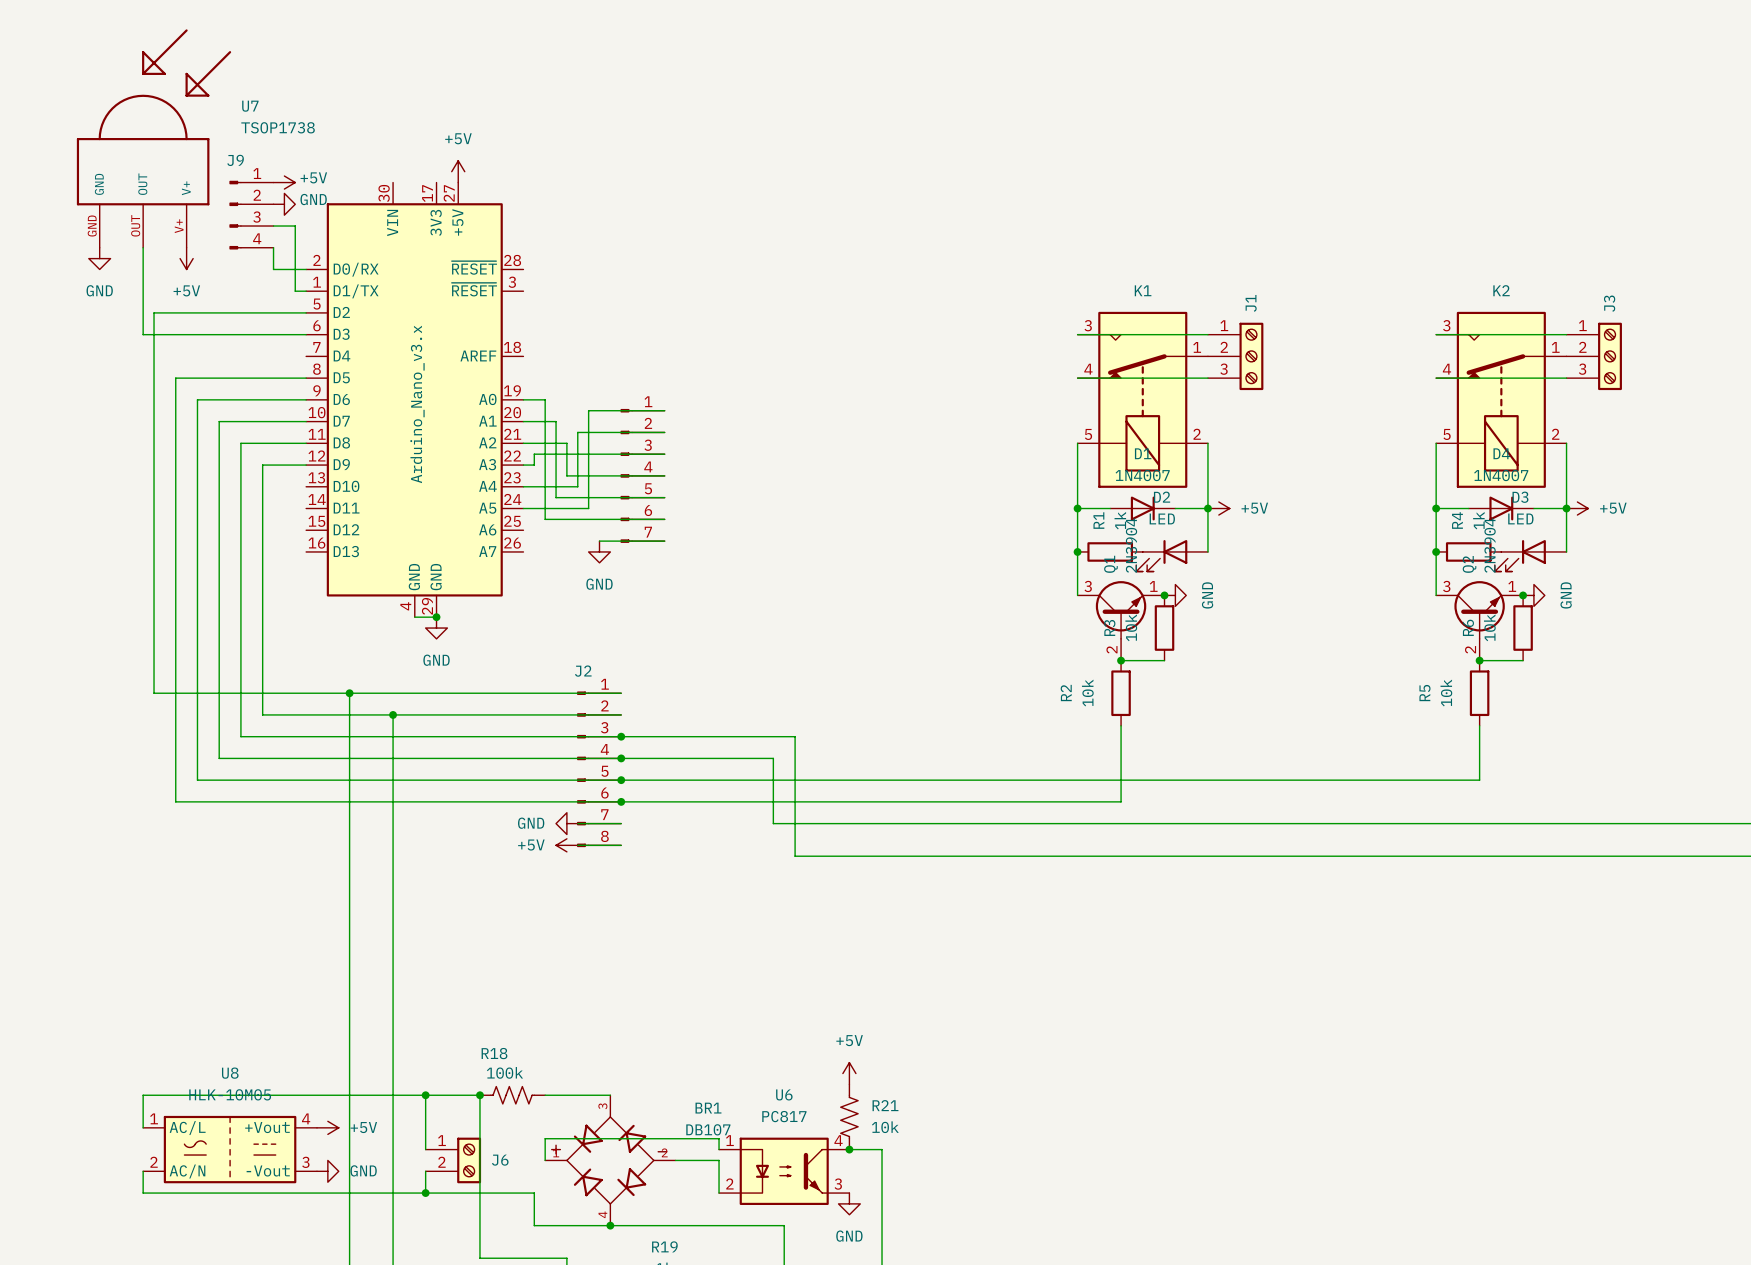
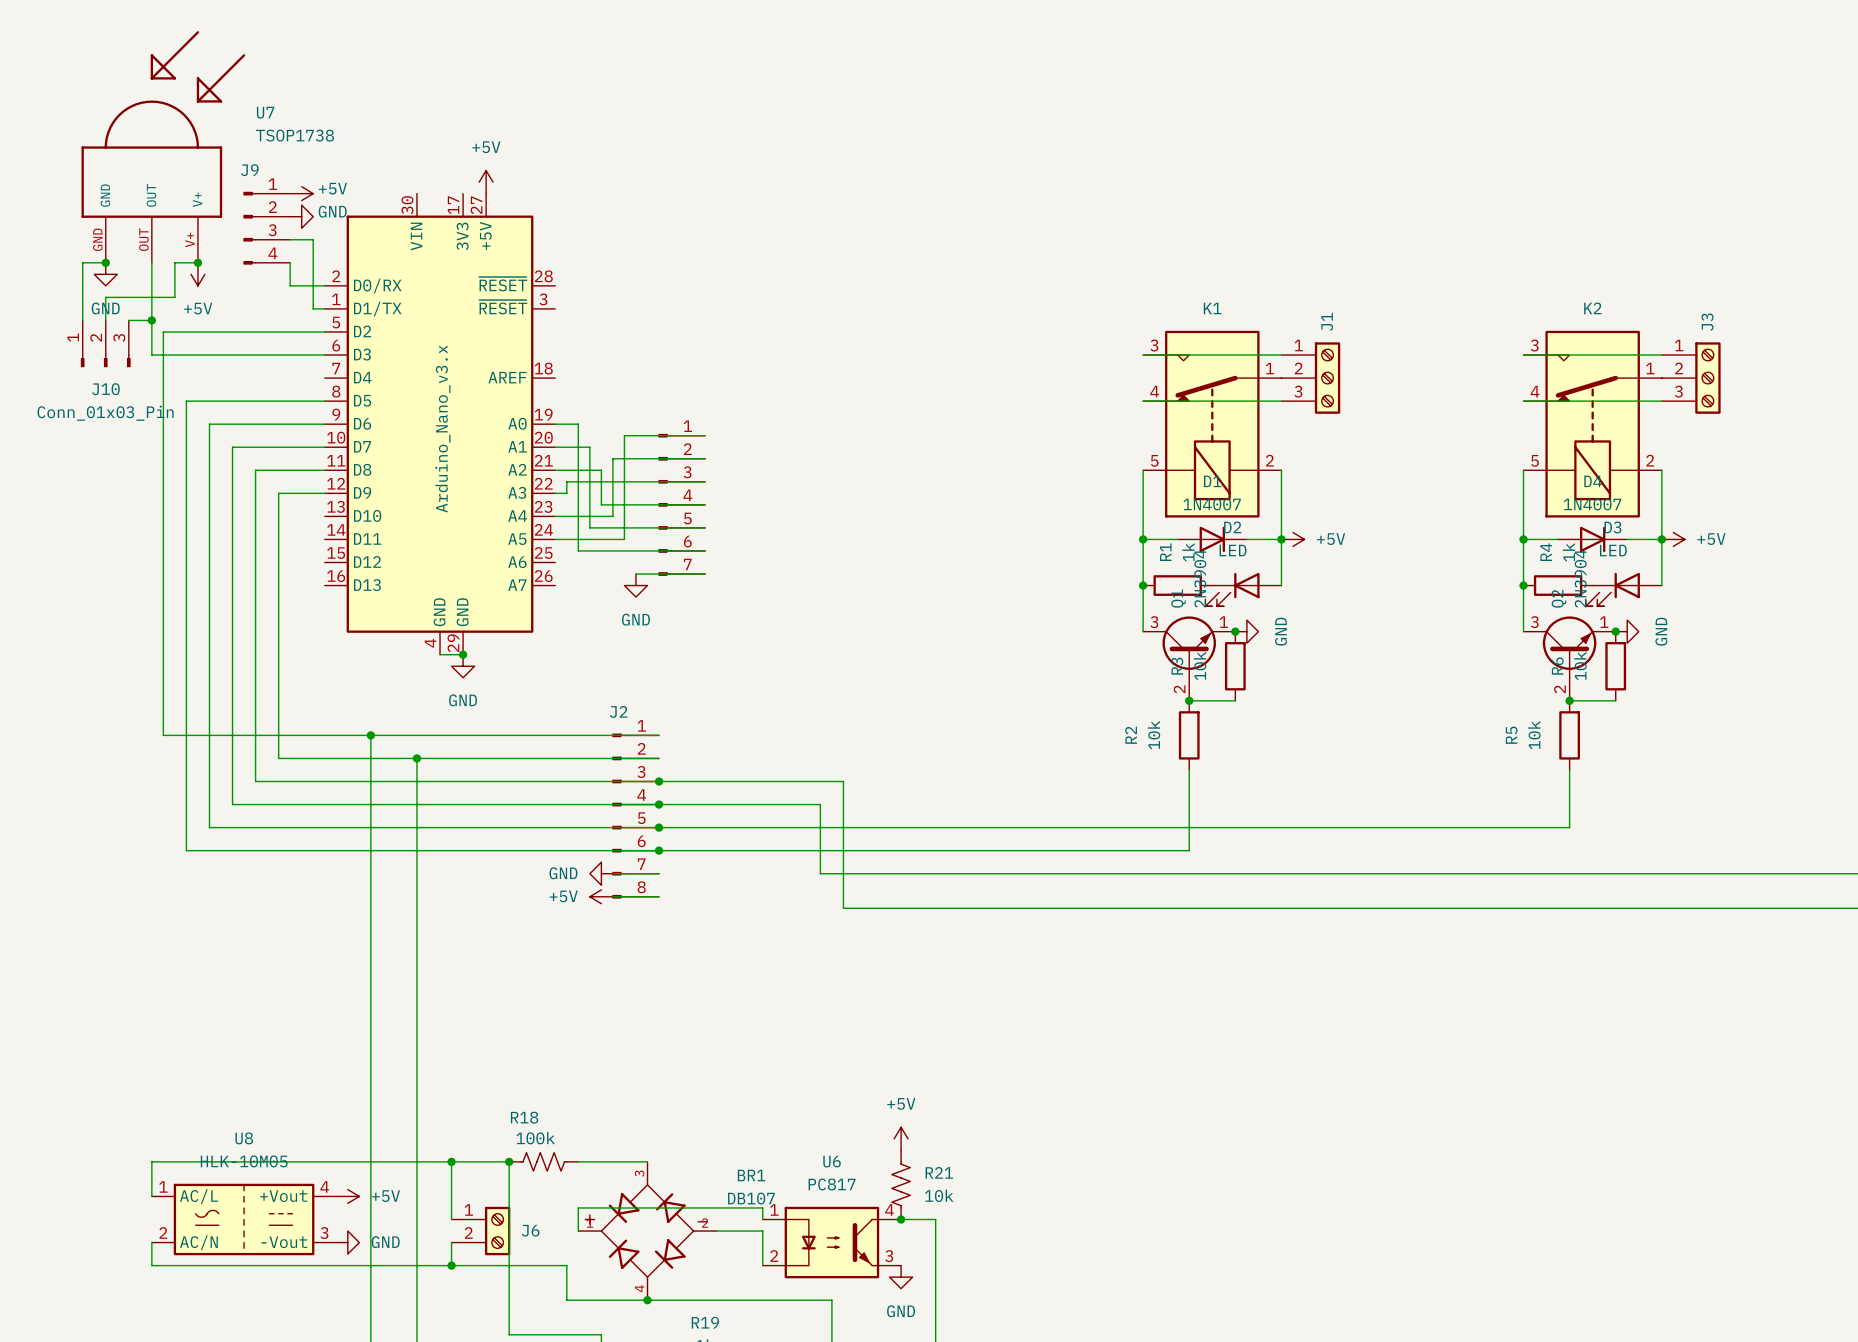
wire: none -> (105, 262) (82, 262) (82, 320)
junction: none -> (105, 262)
wire: none -> (197, 262) (174, 262) (174, 297) (105, 297) (105, 320)
junction: none -> (197, 262)
wire: none -> (128, 320) (151, 320)
junction: none -> (151, 320)
J10: none -> Conn_01x03_Pin (105, 343)

